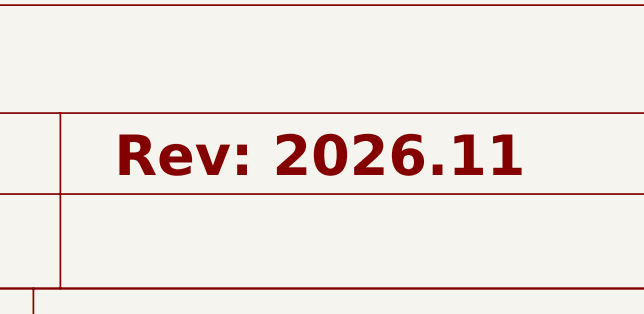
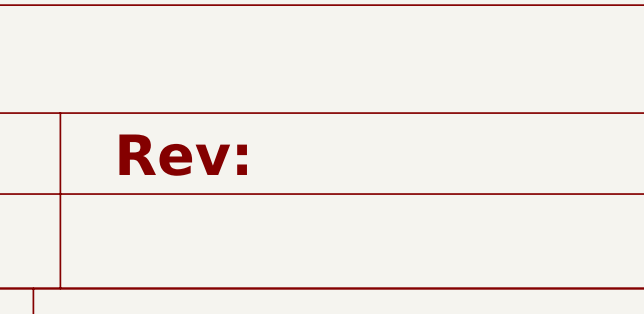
title block: Rev: 2026.11 (320, 154) -> Rev: (183, 155)

